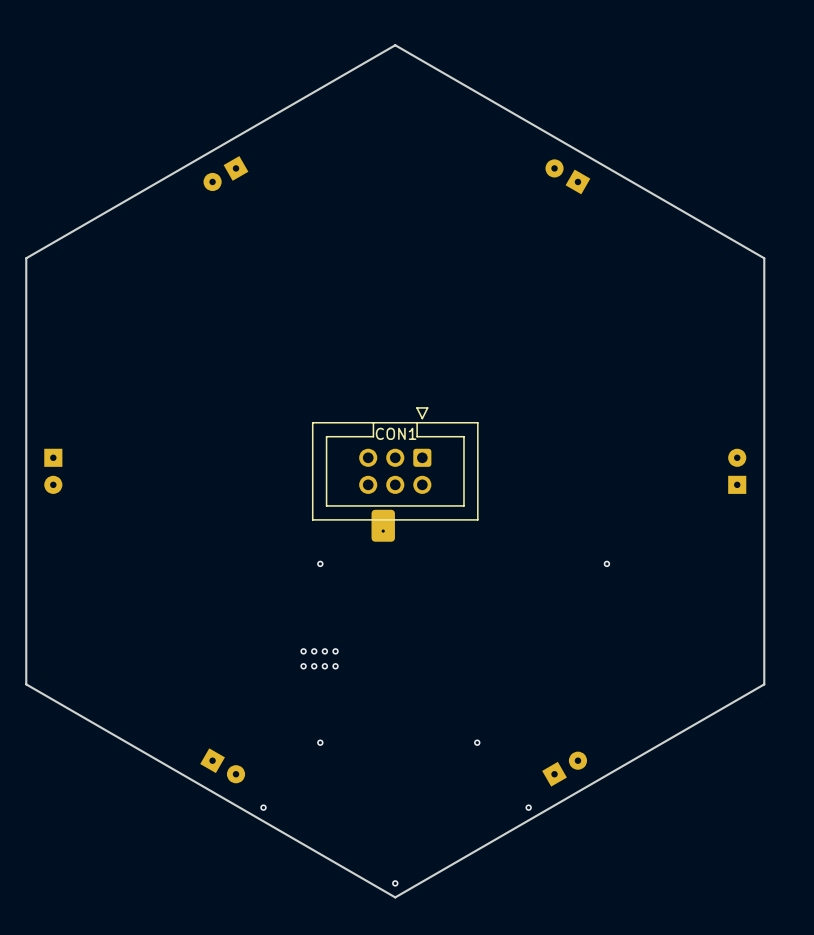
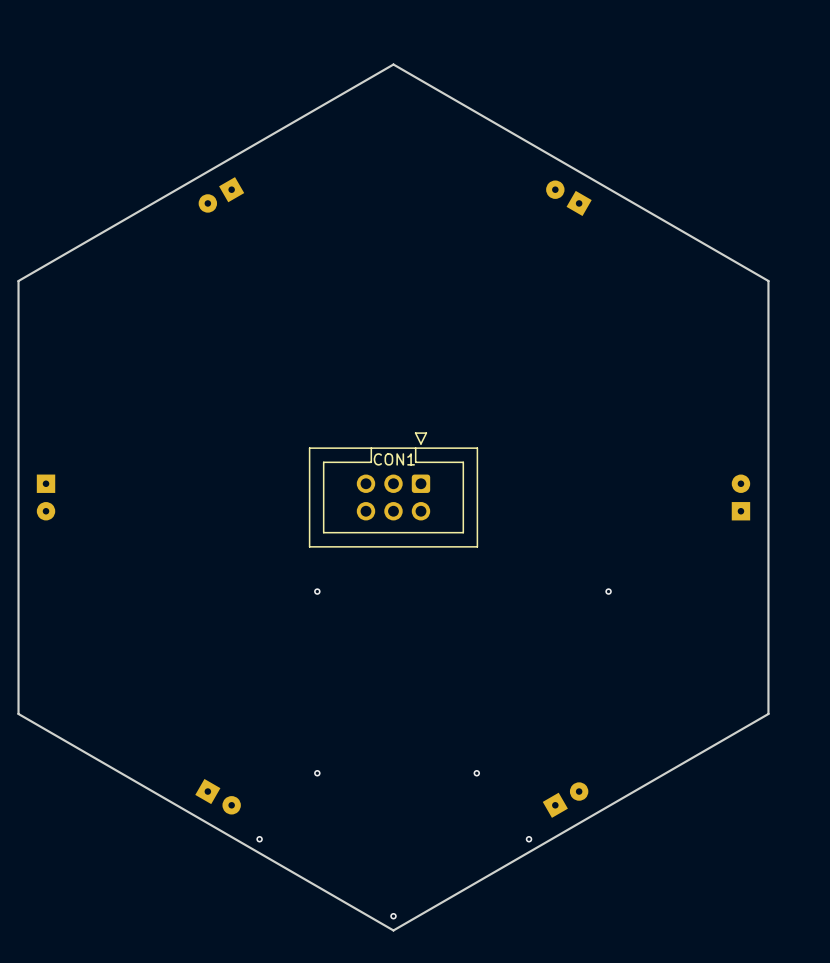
part: (383, 525) -> none
via: (303, 651) -> none
via: (314, 651) -> none
via: (324, 651) -> none
via: (335, 651) -> none
via: (303, 666) -> none
via: (314, 666) -> none
via: (324, 666) -> none
via: (335, 666) -> none

